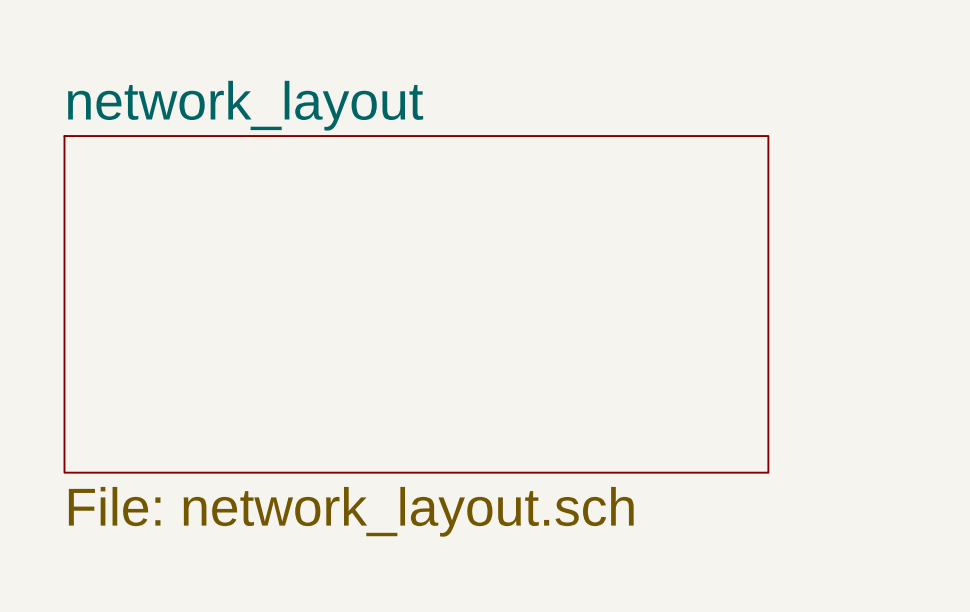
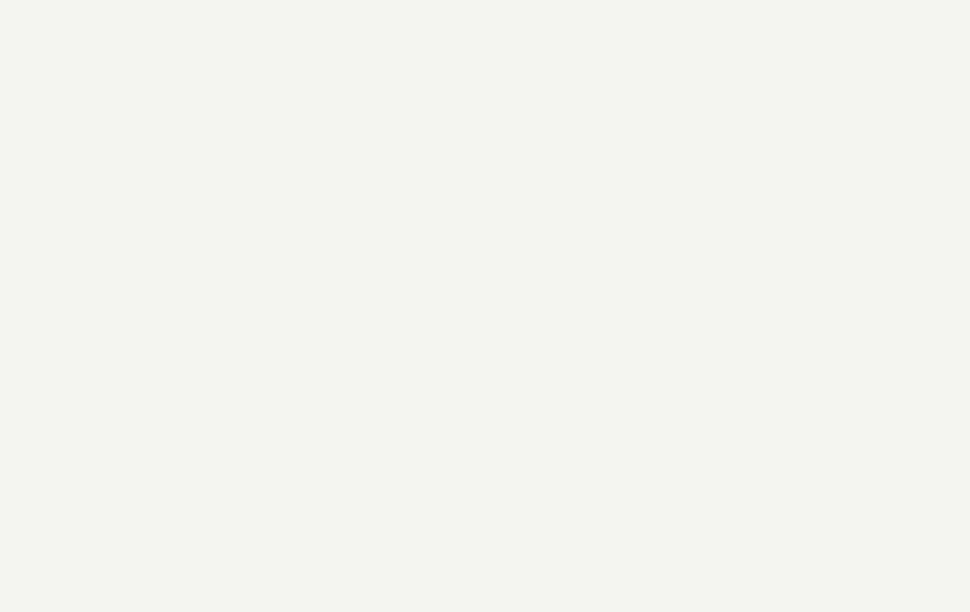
sheet network_layout: File: network_layout.sch (416, 304) -> none

